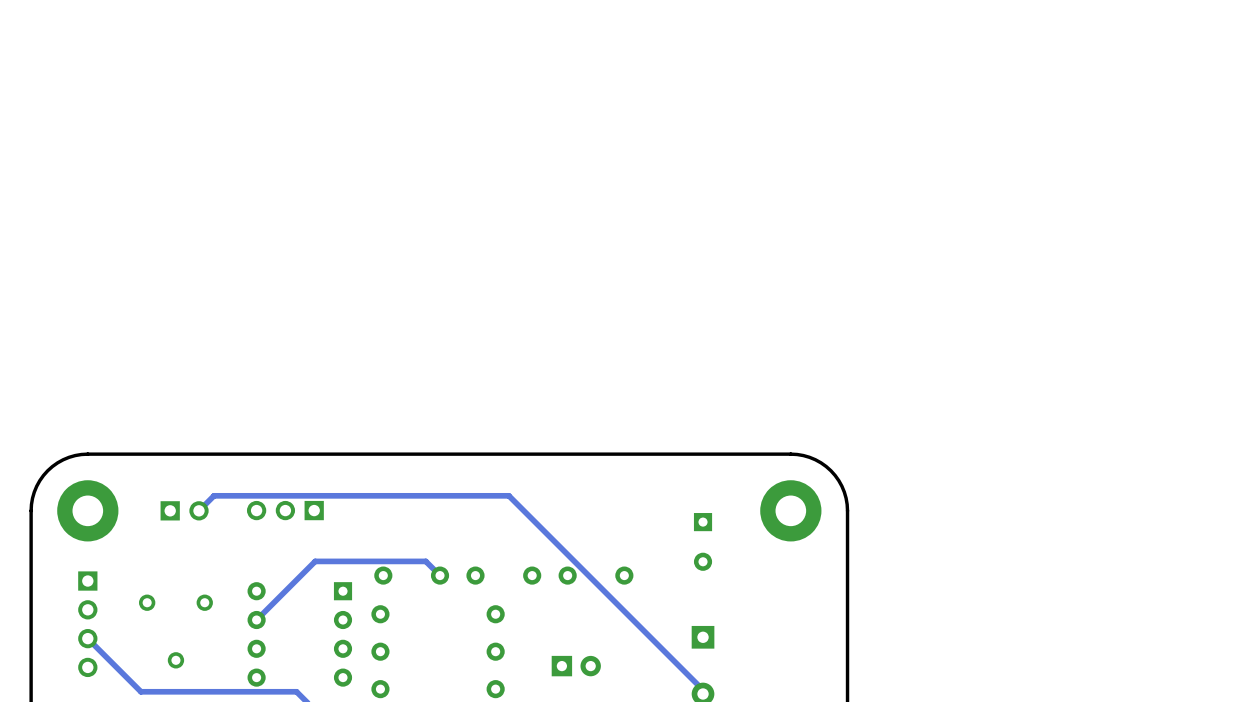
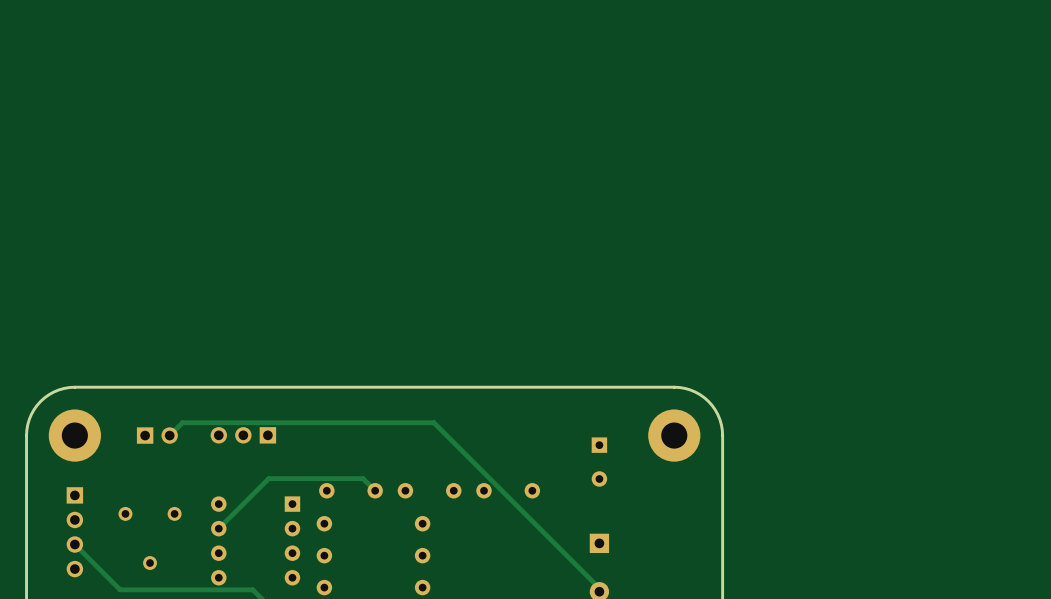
part: (576, 666) -> none

